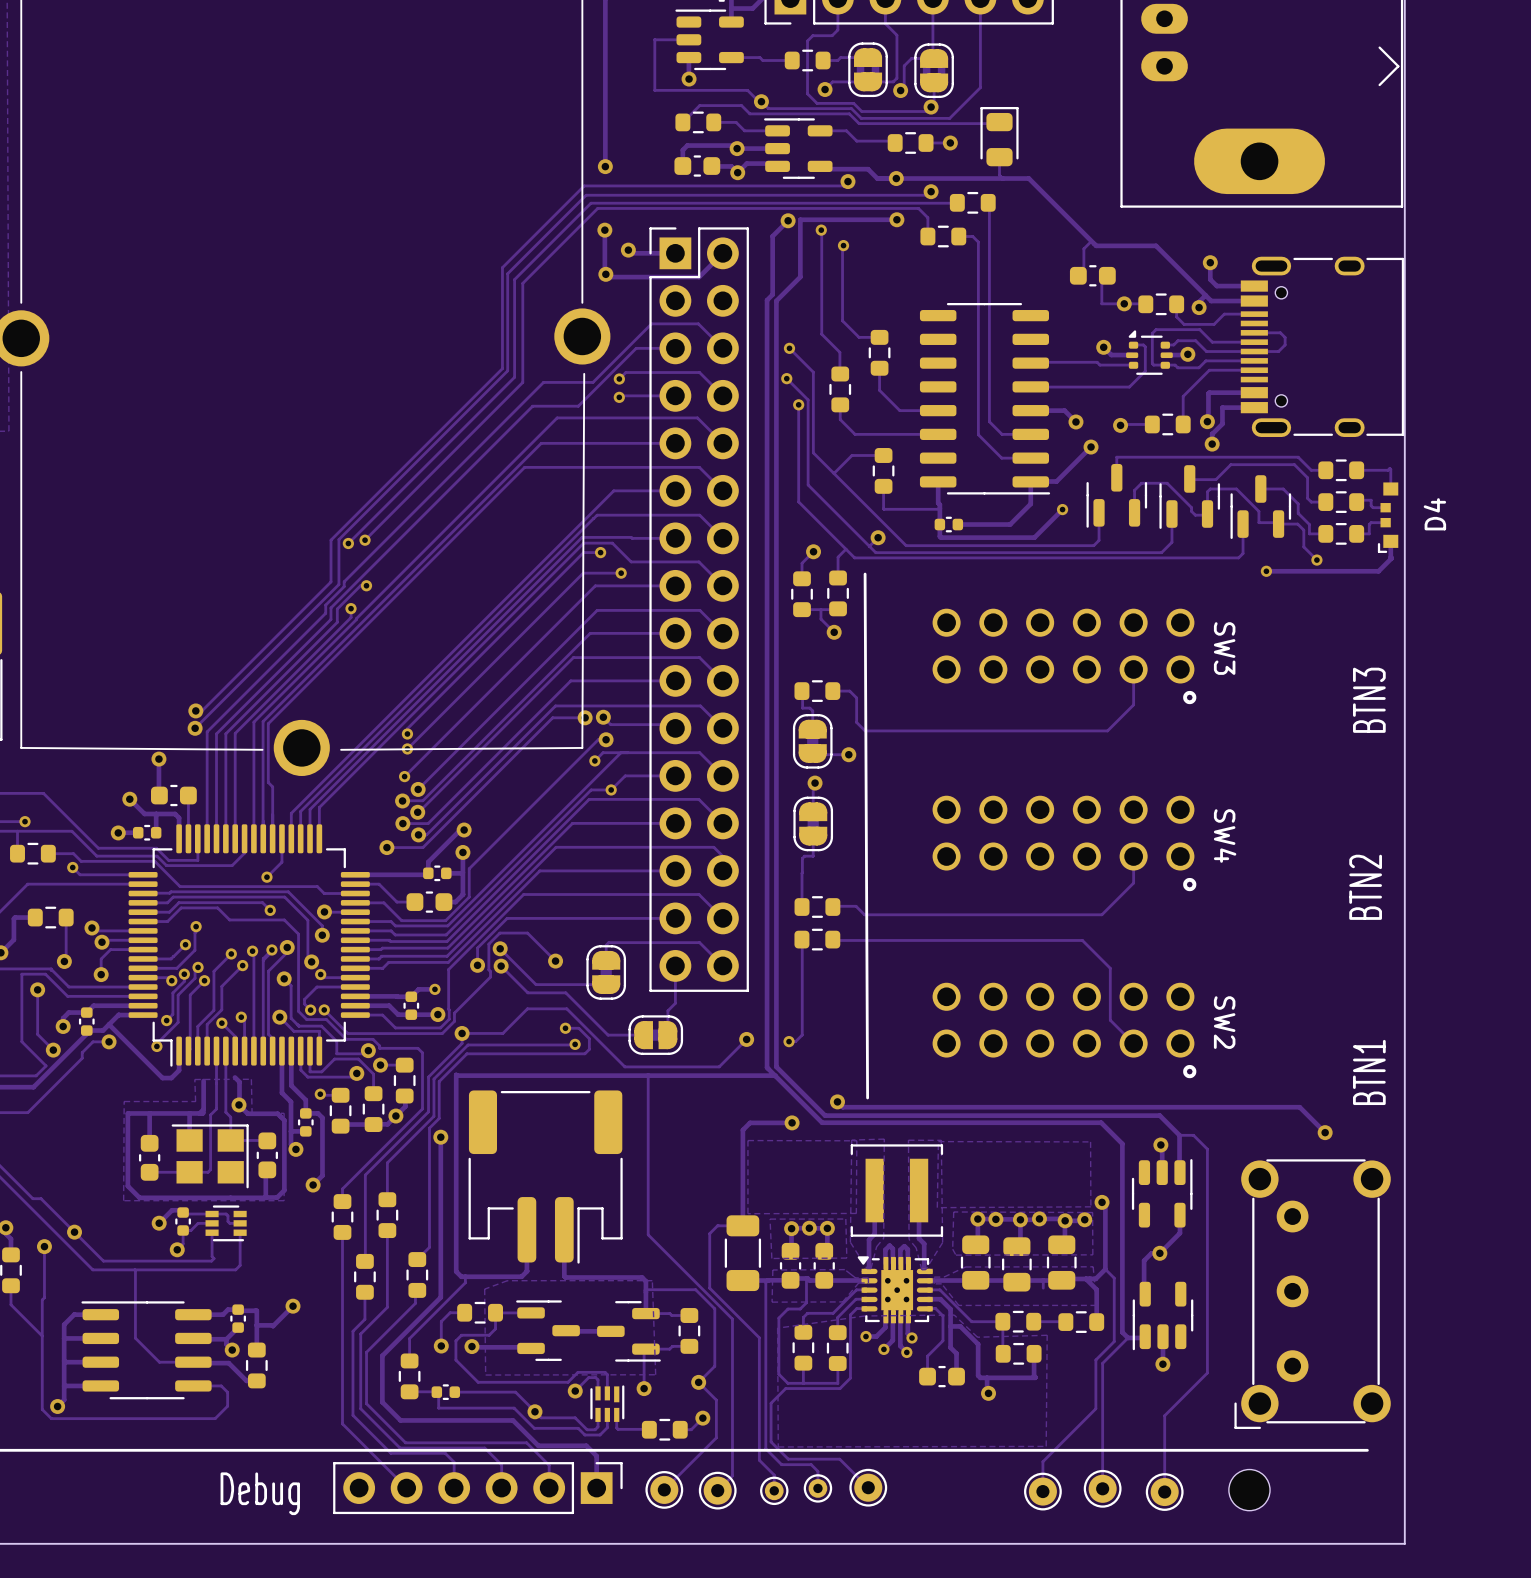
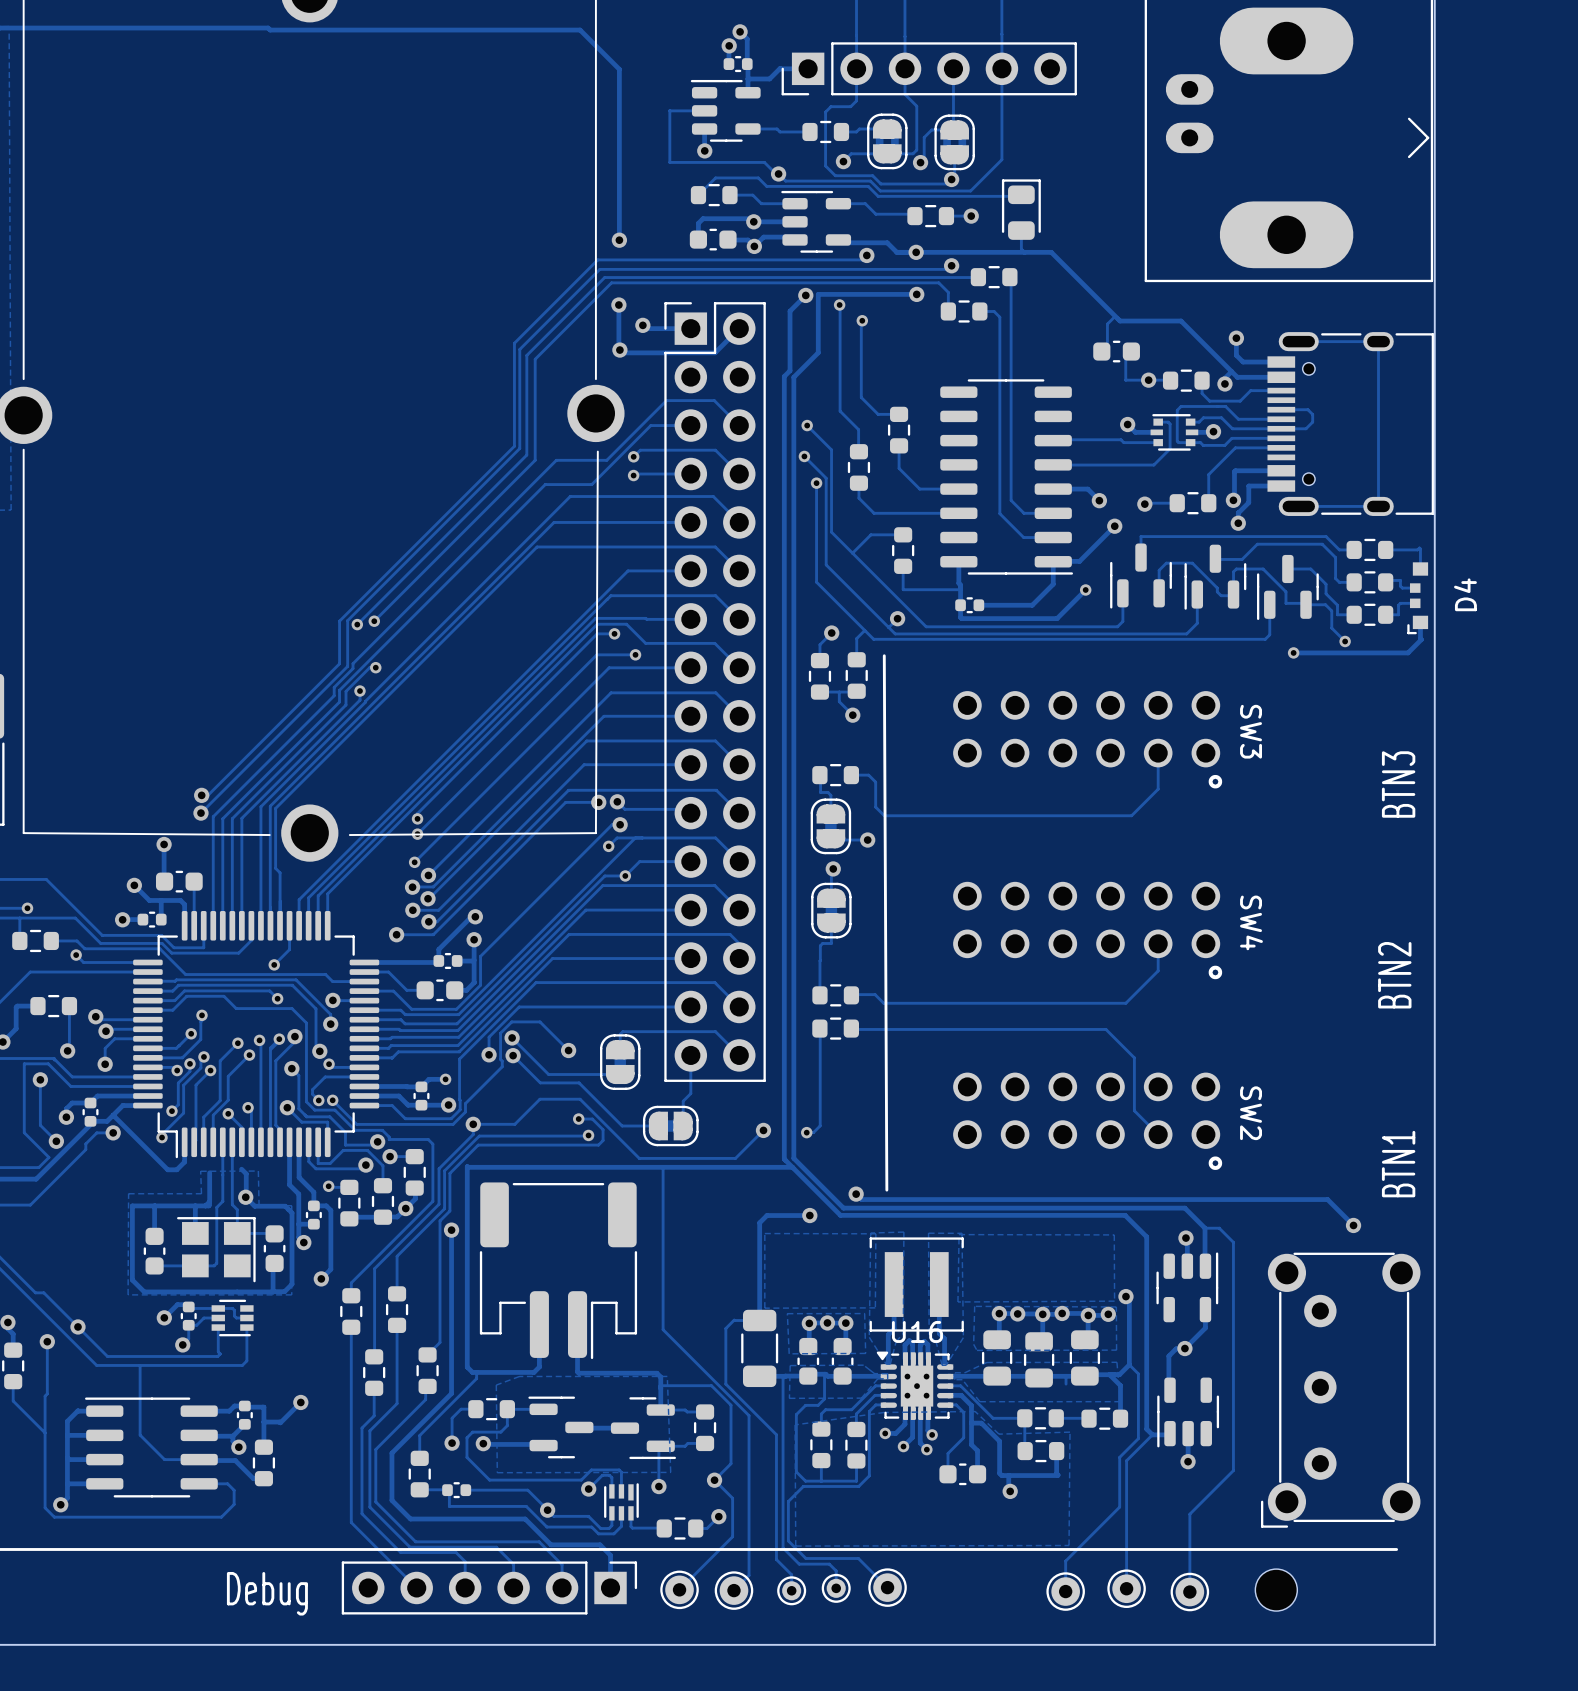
track: none -> (1298, 341) (1378, 341) (1378, 506) (1298, 506)
part footprint: [1126, 330, 1173, 375] -> [1150, 414, 1199, 451]
U16 name: none -> U16 (917, 1331)

